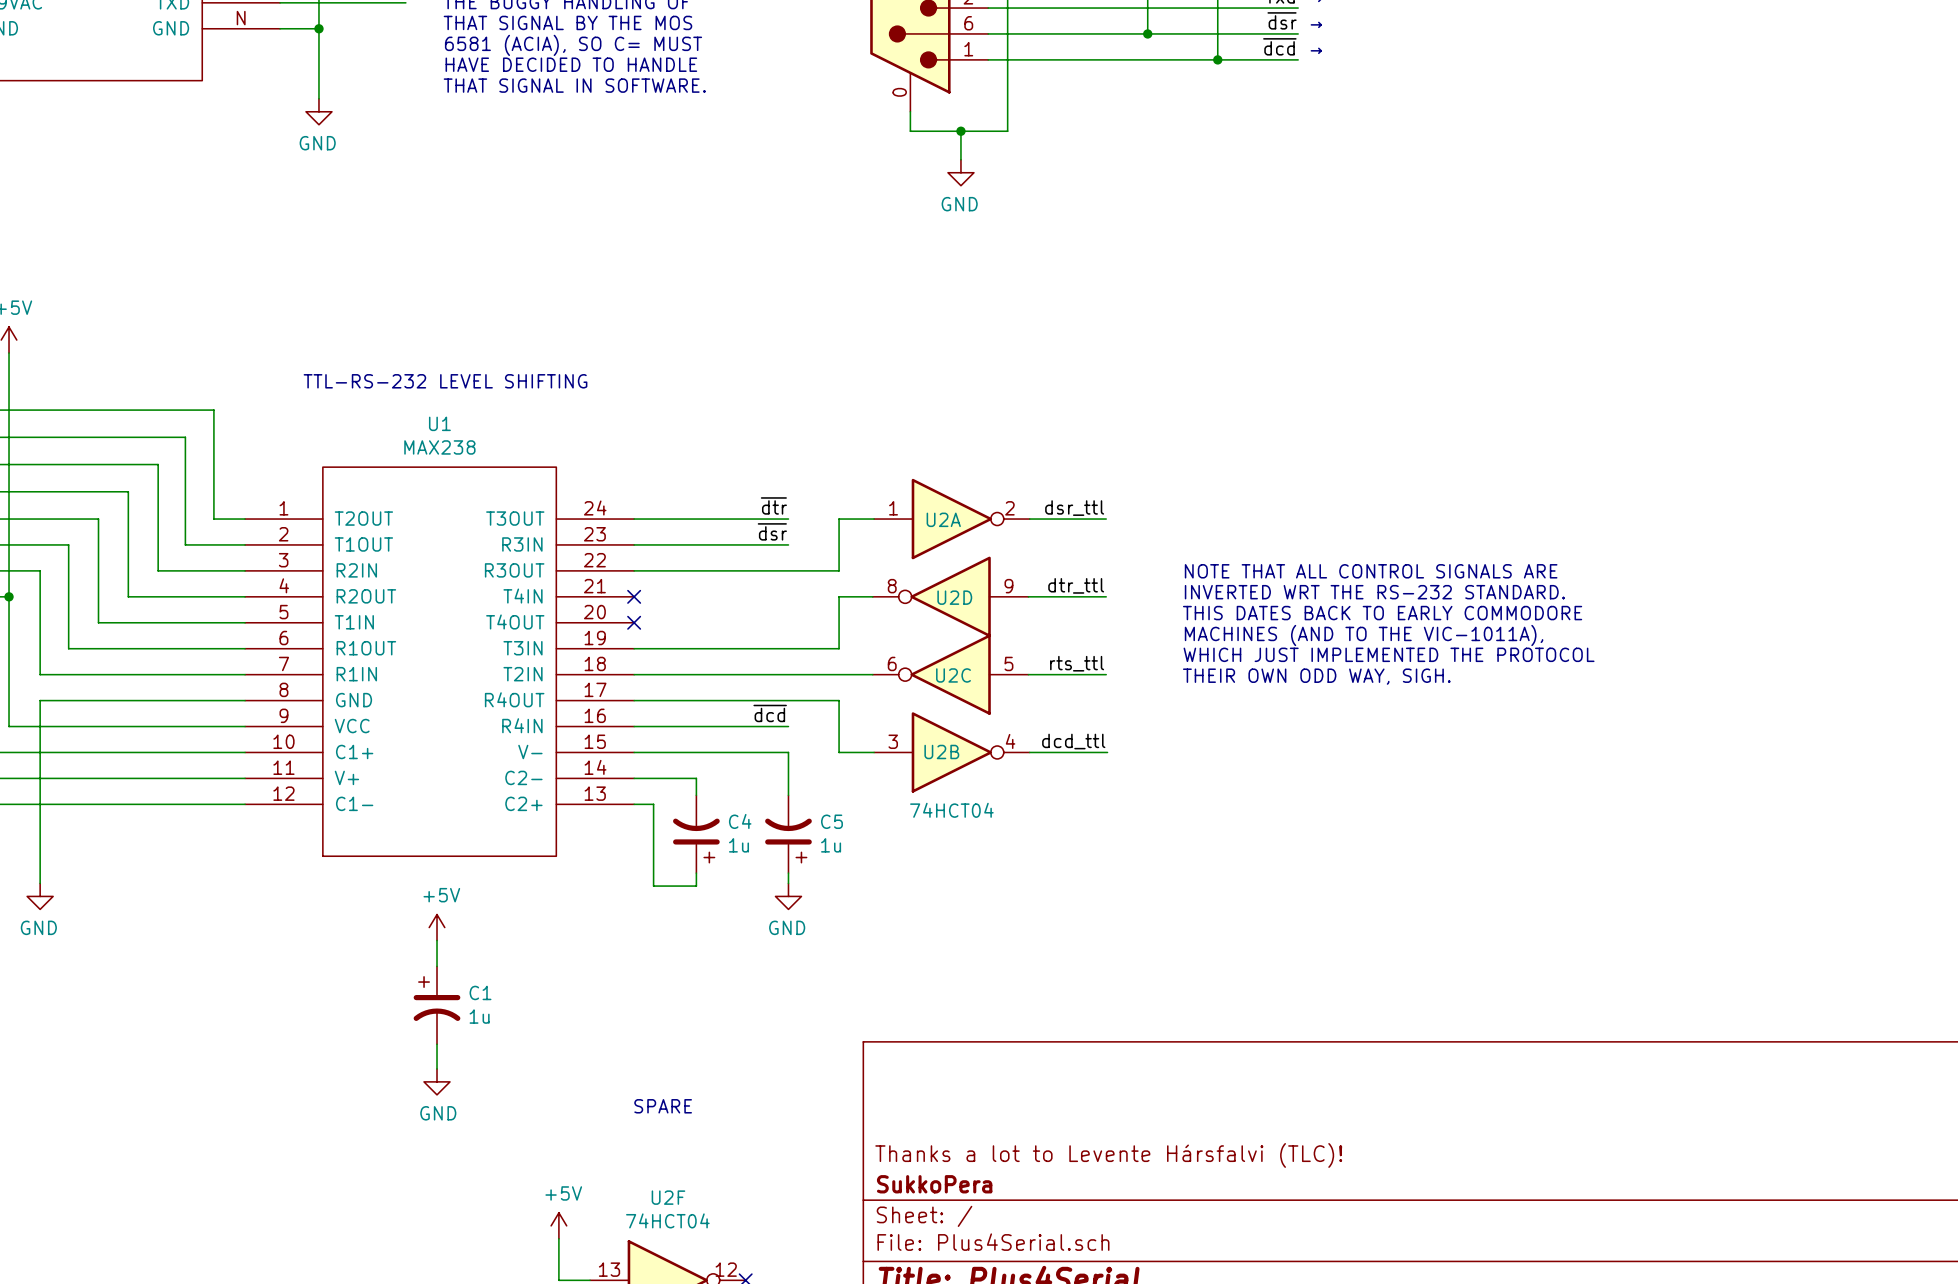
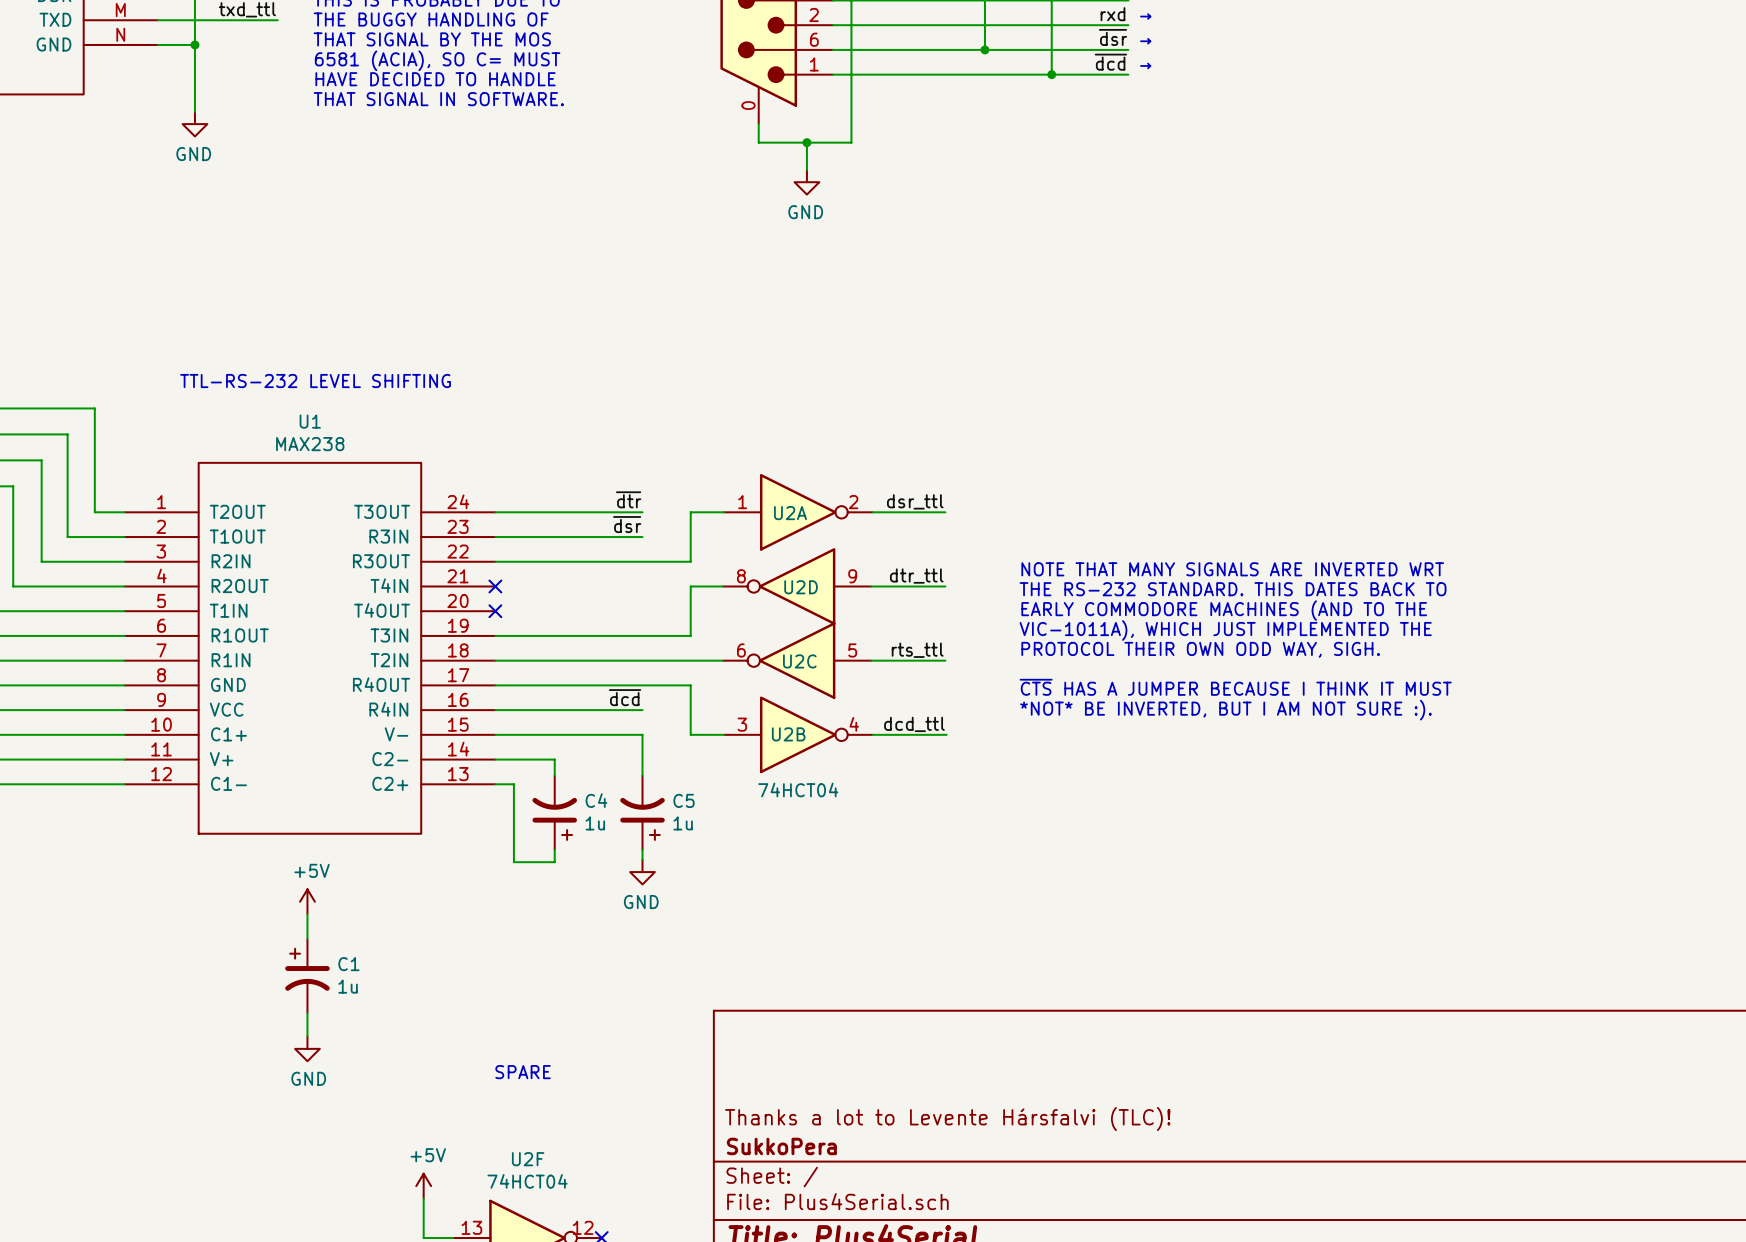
text: NOTE THAT ALL CONTROL SIGNALS ARE (1371, 571) -> NOTE THAT MANY SIGNALS ARE INVERTED WRT (1232, 569)
text: INVERTED WRT THE RS-232 STANDARD. (1374, 592) -> none
text: none -> THE RS-232 STANDARD. THIS DATES BACK TO (1233, 589)
text: THIS DATES BACK TO EARLY COMMODORE (1382, 613) -> none
text: none -> EARLY COMMODORE MACHINES (AND TO THE (1224, 610)
text: MACHINES (AND TO THE VIC-1011A), (1364, 635) -> none
text: WHICH JUST IMPLEMENTED THE PROTOCOL (1389, 654) -> VIC-1011A), WHICH JUST IMPLEMENTED THE (1225, 630)
text: THEIR OWN ODD WAY, SIGH. (1316, 676) -> PROTOCOL THEIR OWN ODD WAY, SIGH. (1200, 649)
text: none -> ~{CTS} HAS A JUMPER BECAUSE I THINK IT MUST (1235, 687)
text: none -> *NOT* BE INVERTED, BUT I AM NOT SURE :). (1225, 710)

